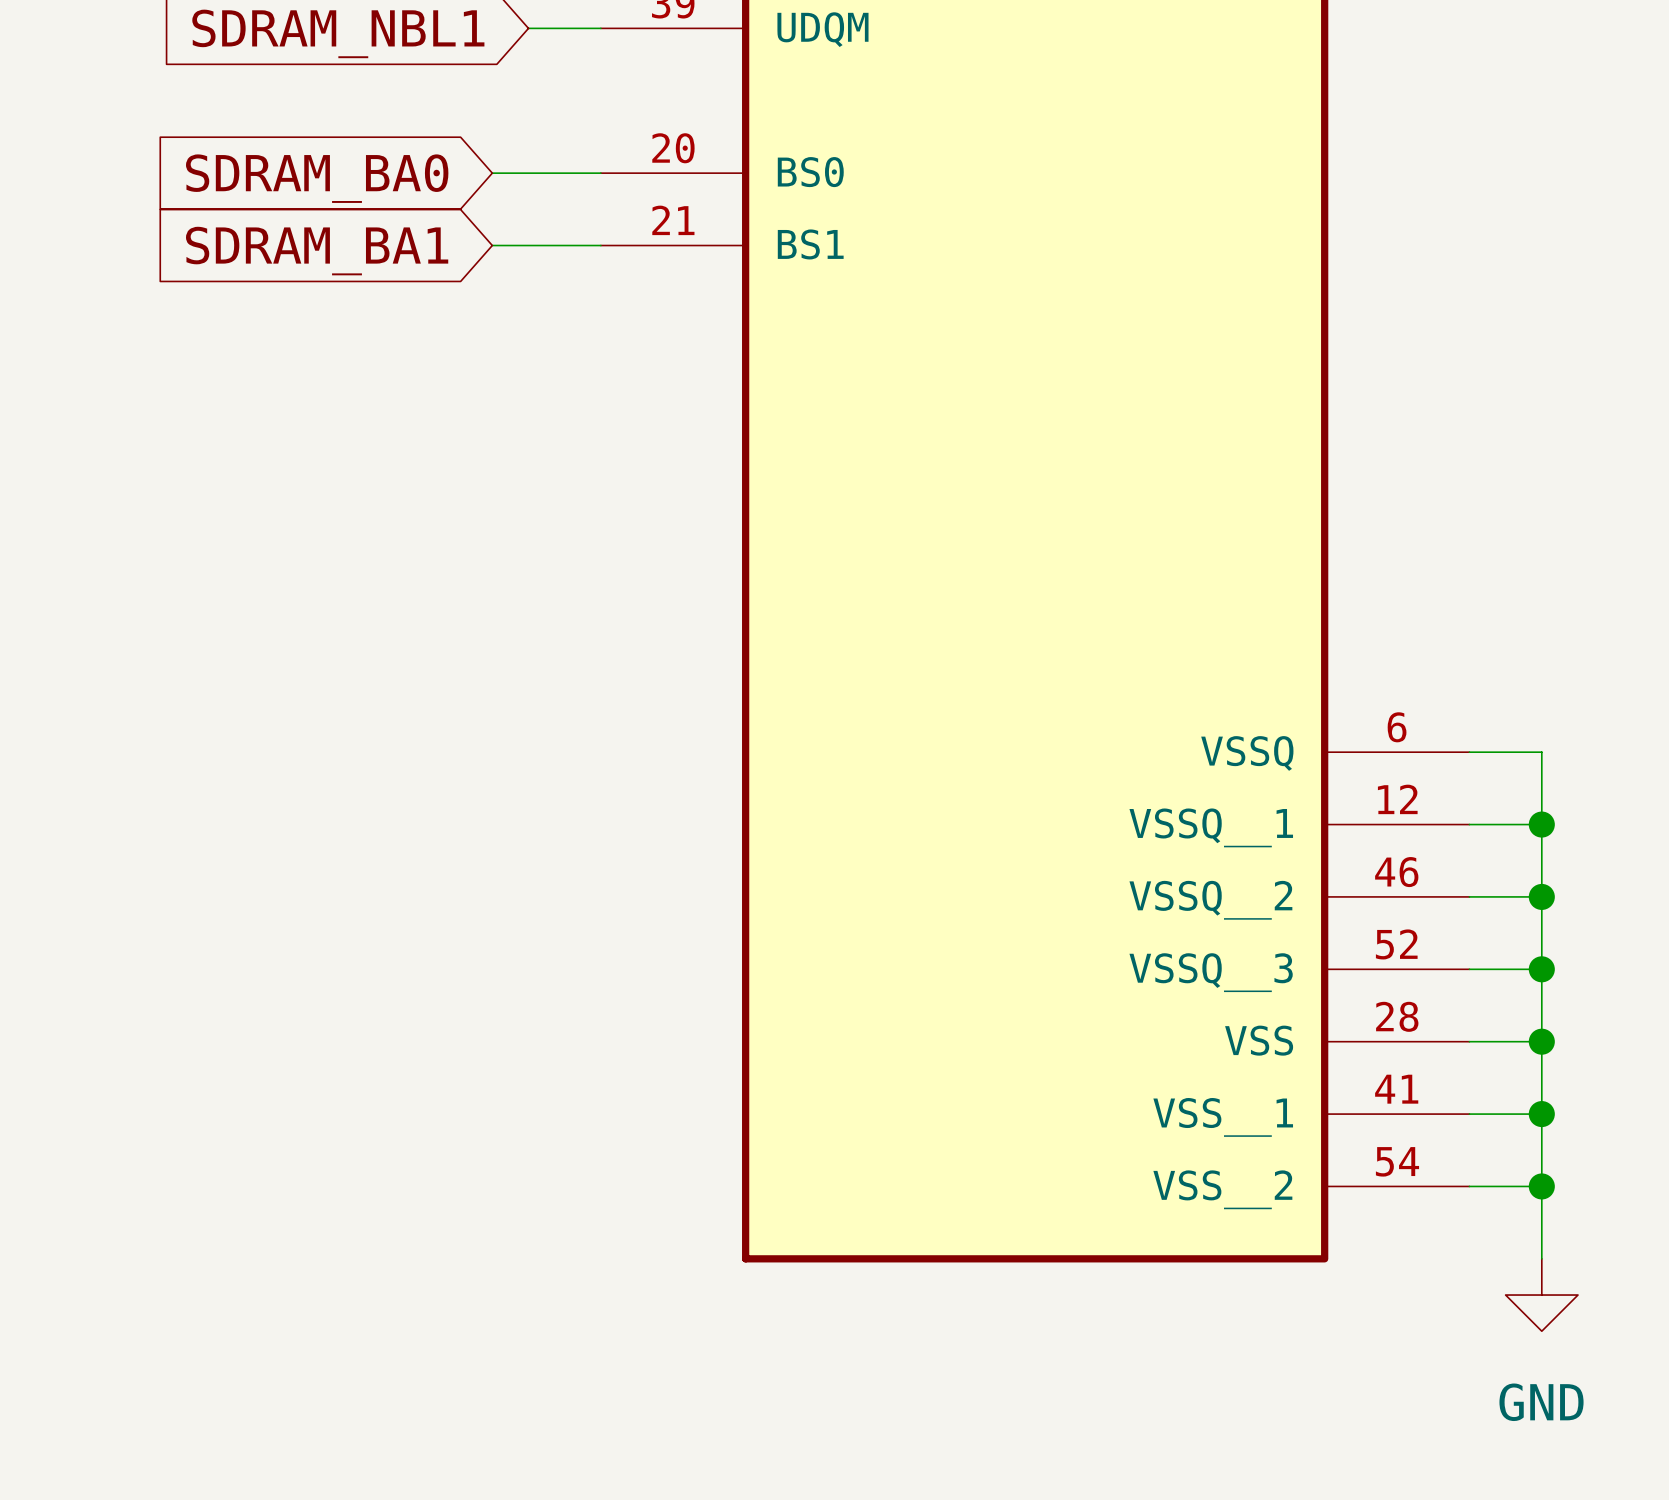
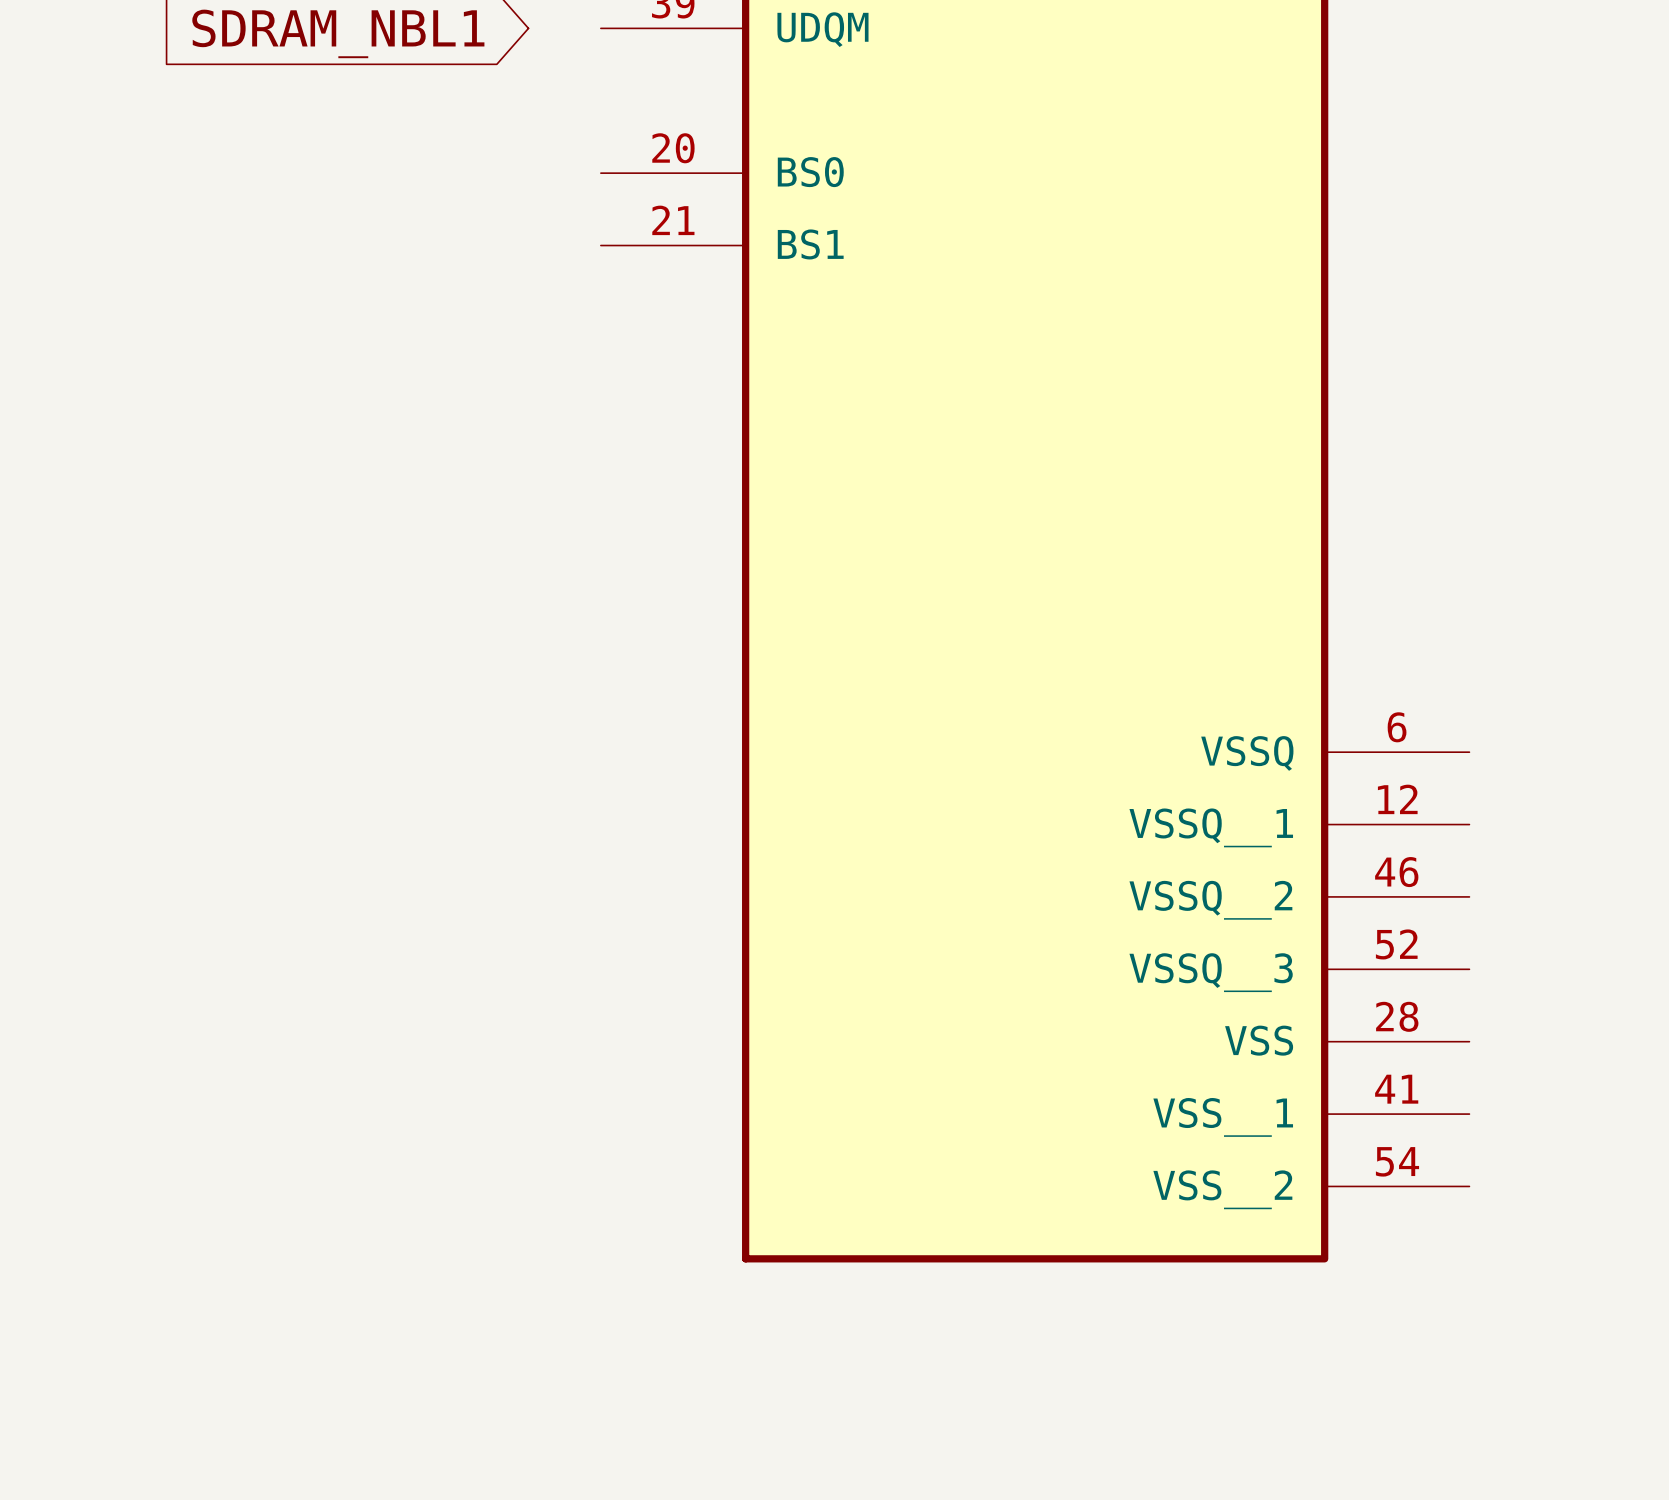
wire: (528, 28) (600, 28) -> none
wire: (492, 173) (600, 173) -> none
global label: SDRAM_BA0 (317, 178) -> none
wire: (492, 245) (600, 245) -> none
global label: SDRAM_BA1 (317, 251) -> none
wire: (1469, 752) (1541, 752) (1541, 1258) -> none
wire: (1469, 824) (1541, 824) -> none
junction: (1541, 824) -> none
wire: (1469, 896) (1541, 896) -> none
junction: (1541, 896) -> none
wire: (1469, 969) (1541, 969) -> none
junction: (1541, 969) -> none
wire: (1469, 1041) (1541, 1041) -> none
junction: (1541, 1041) -> none
wire: (1469, 1114) (1541, 1114) -> none
junction: (1541, 1114) -> none
wire: (1469, 1186) (1541, 1186) -> none
junction: (1541, 1186) -> none
power symbol: GND (1541, 1295) -> none

